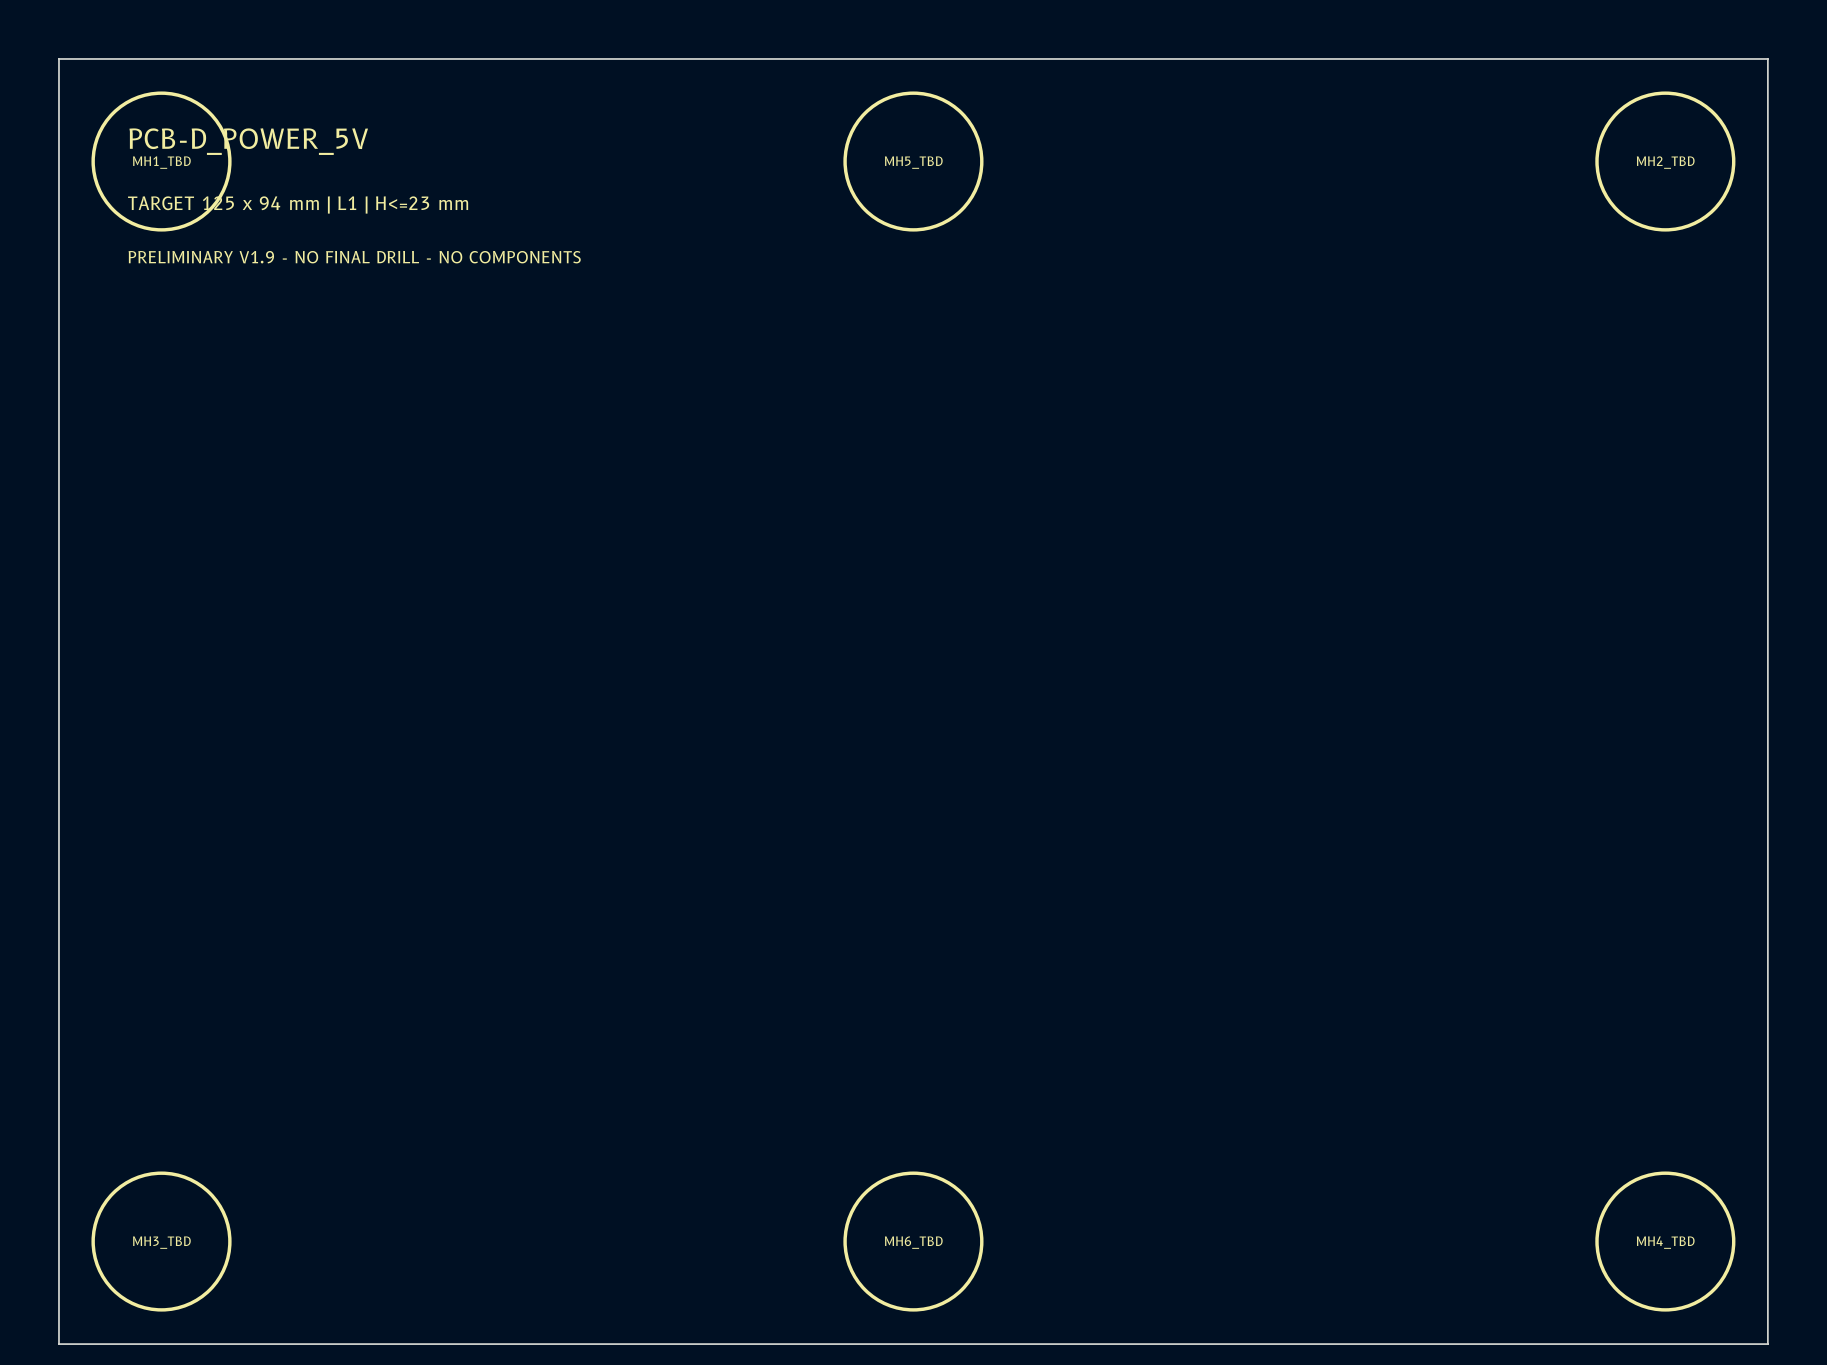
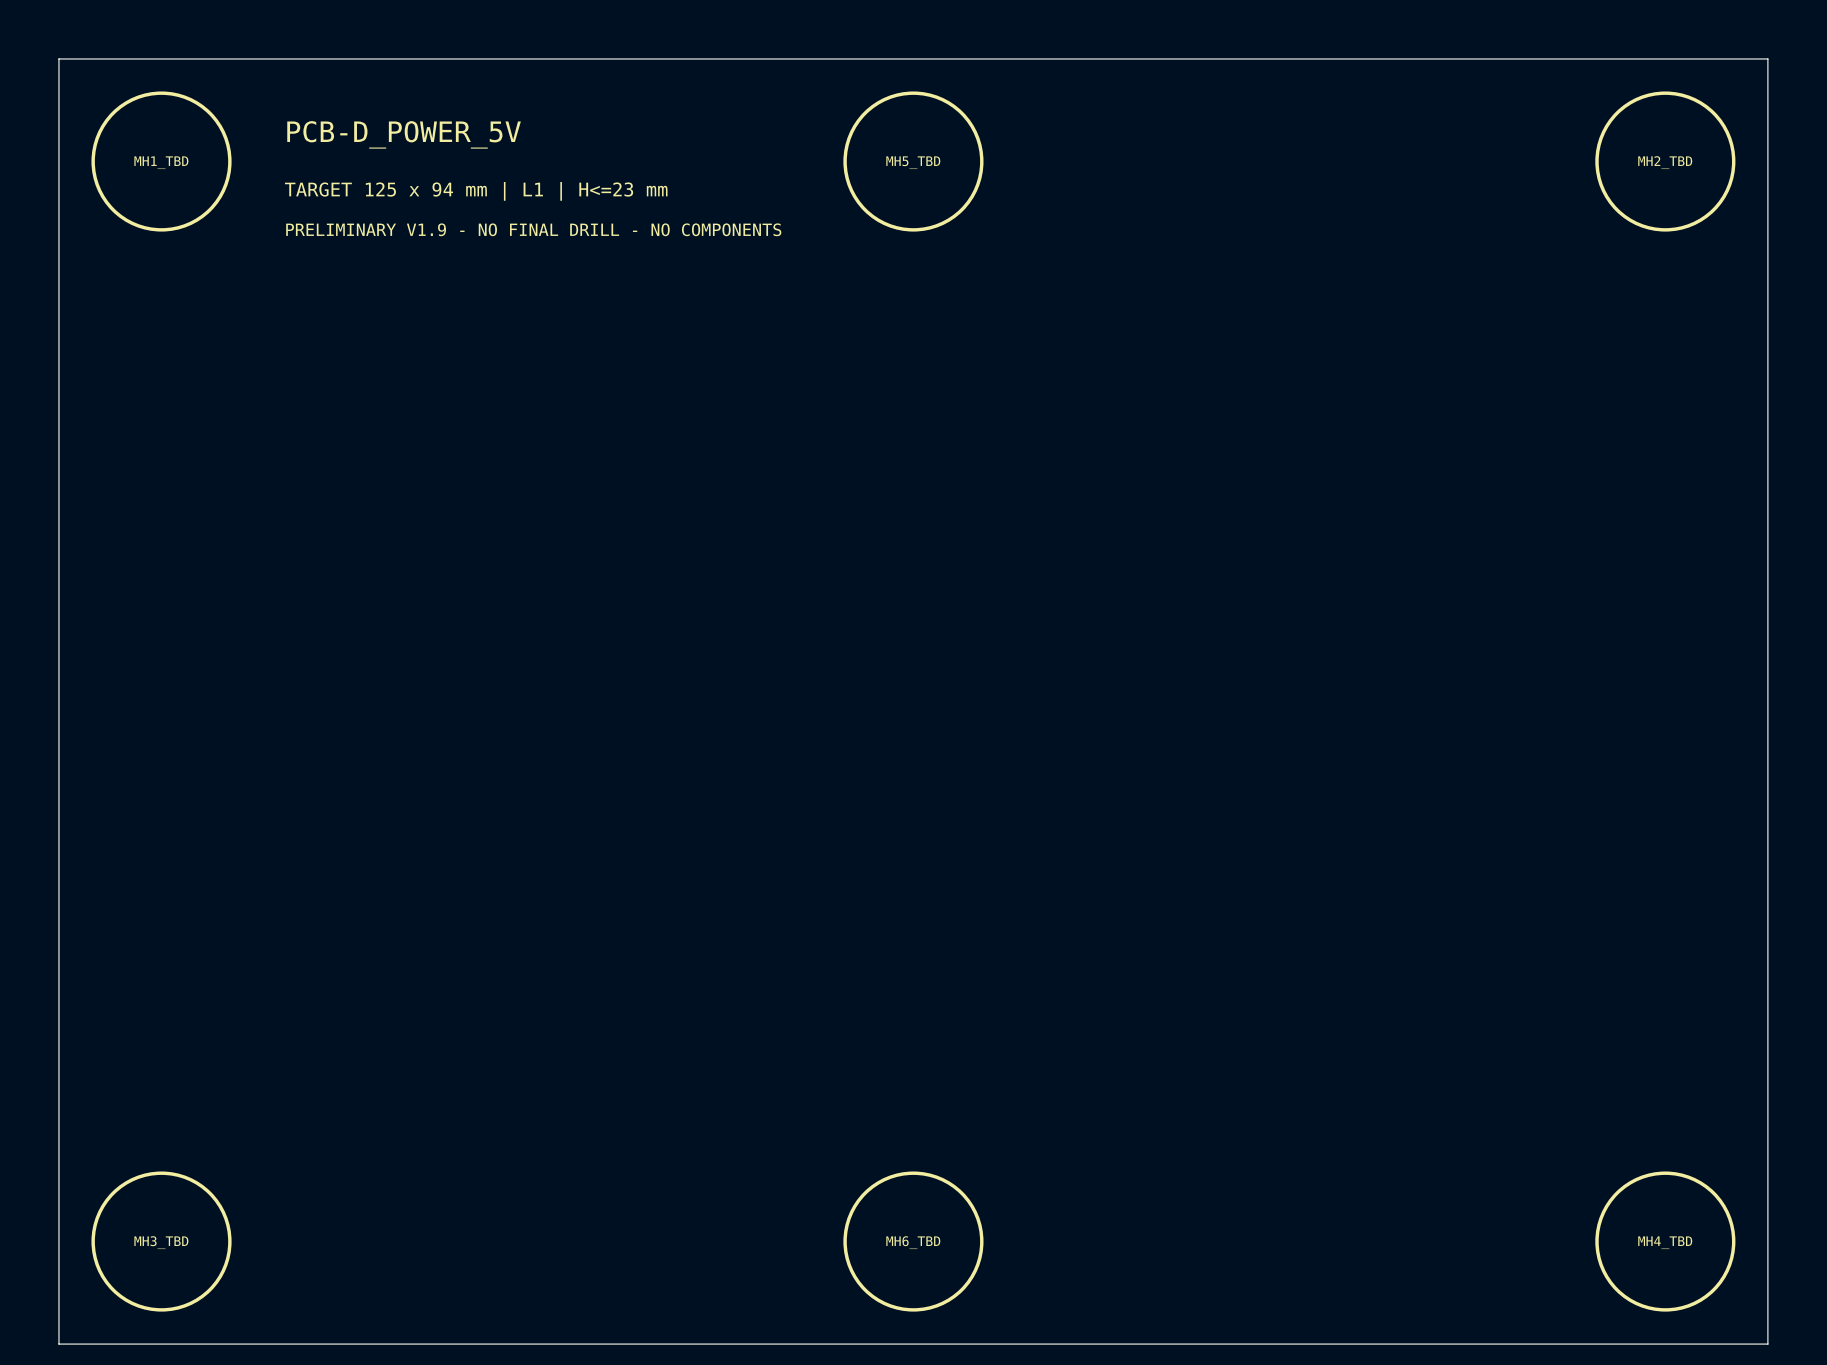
text position: PCB-D_POWER_5V (248, 141) -> PCB-D_POWER_5V (404, 134)
text position: TARGET 125 x 94 mm | L1 | H<=23 mm (298, 204) -> TARGET 125 x 94 mm | L1 | H<=23 mm (476, 191)
text position: PRELIMINARY V1.9 - NO FINAL DRILL - NO COMPONENTS (354, 257) -> PRELIMINARY V1.9 - NO FINAL DRILL - NO COMPONENTS (533, 229)

